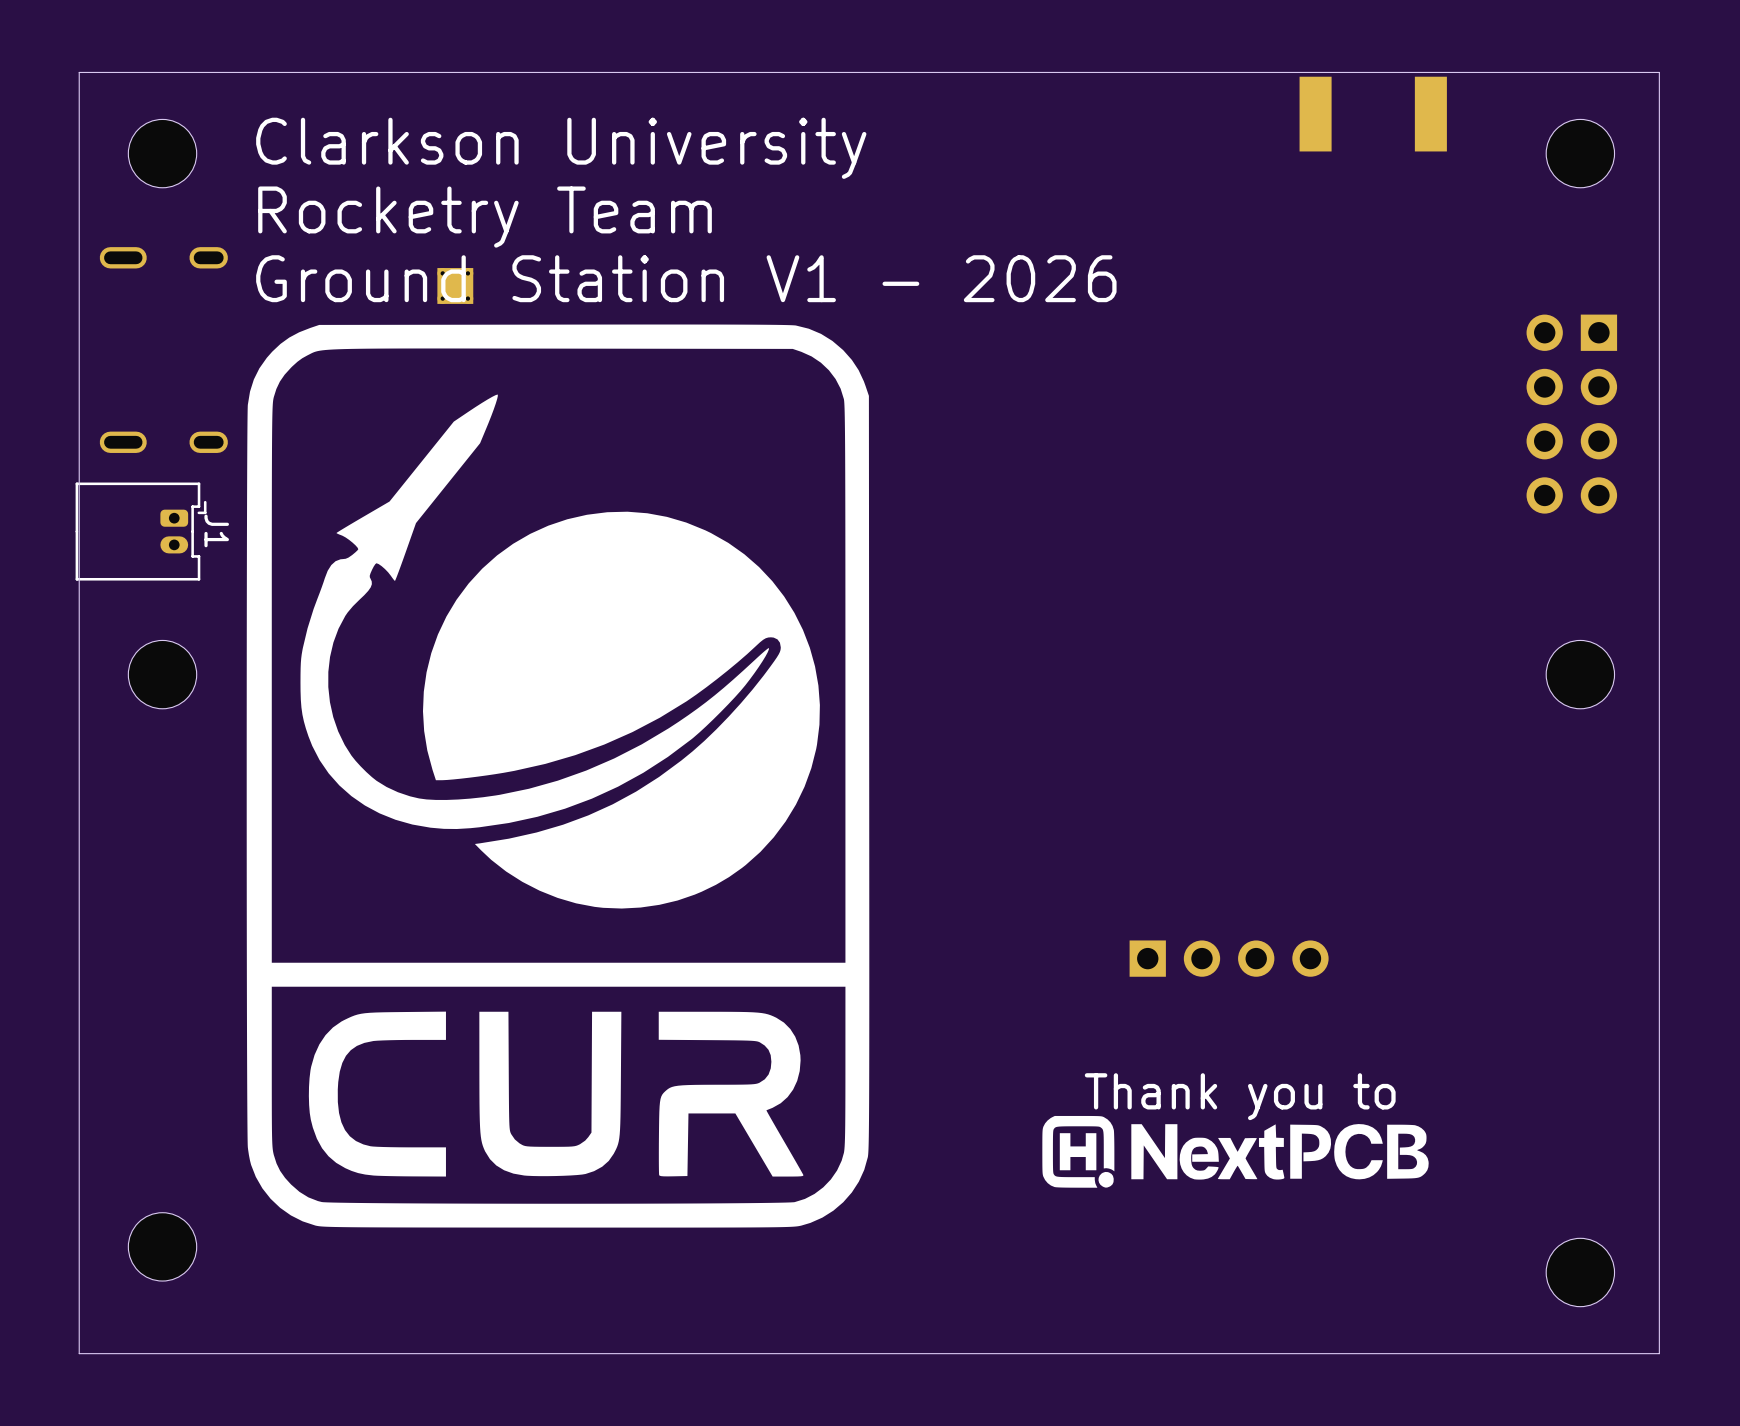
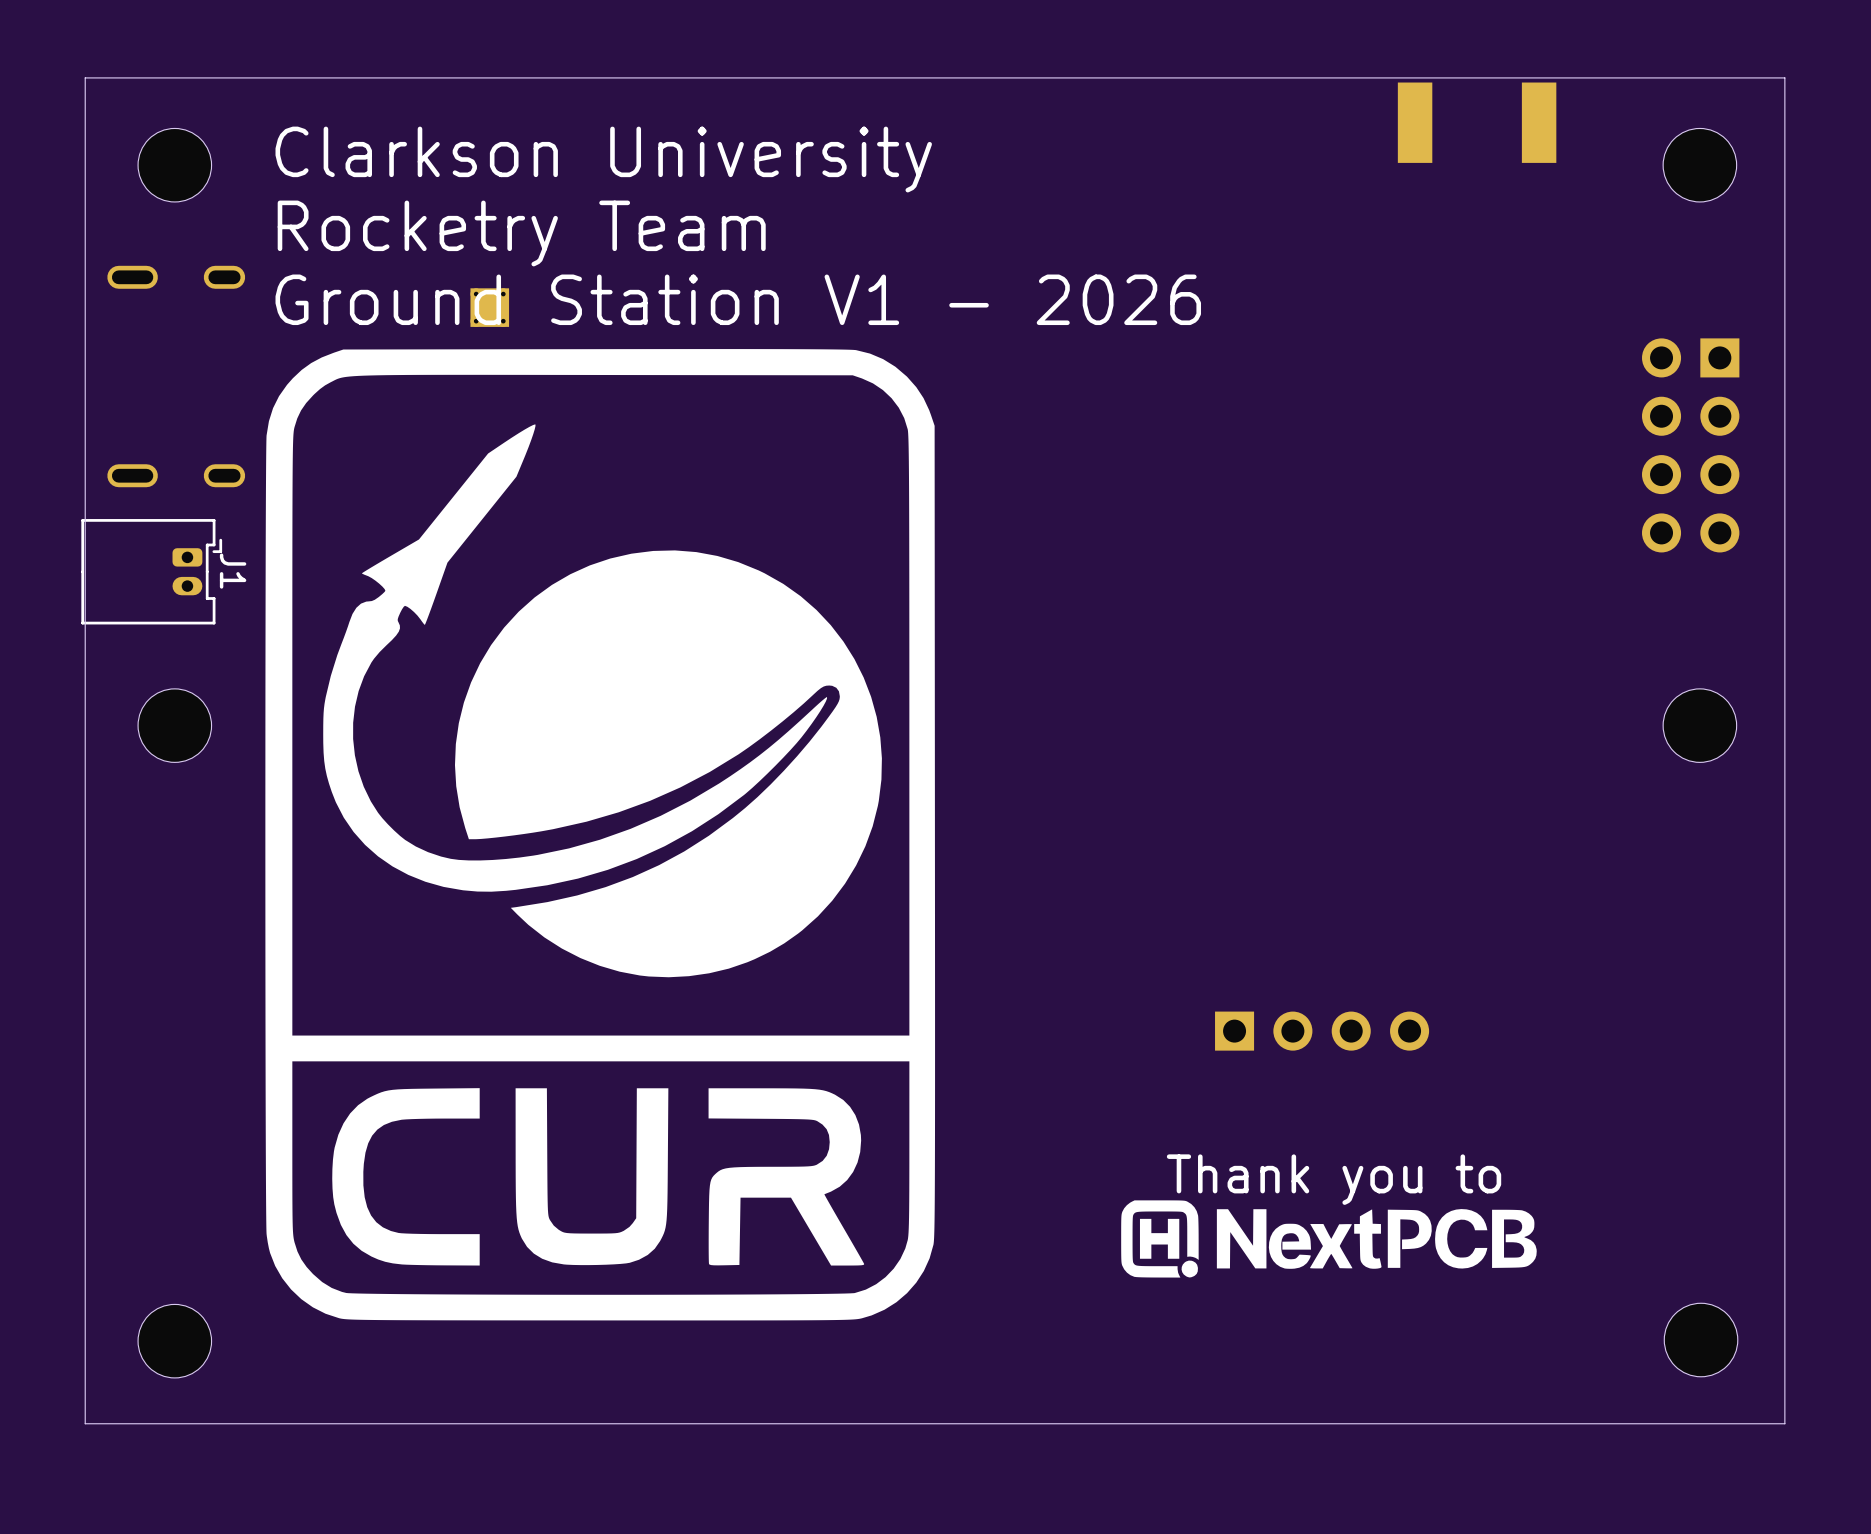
part position: (1580, 1272) -> (1701, 1340)
board edge: (1659, 1323) (1659, 1353) (79, 1353) (79, 1323) -> (1784, 1423) (85, 1423)

